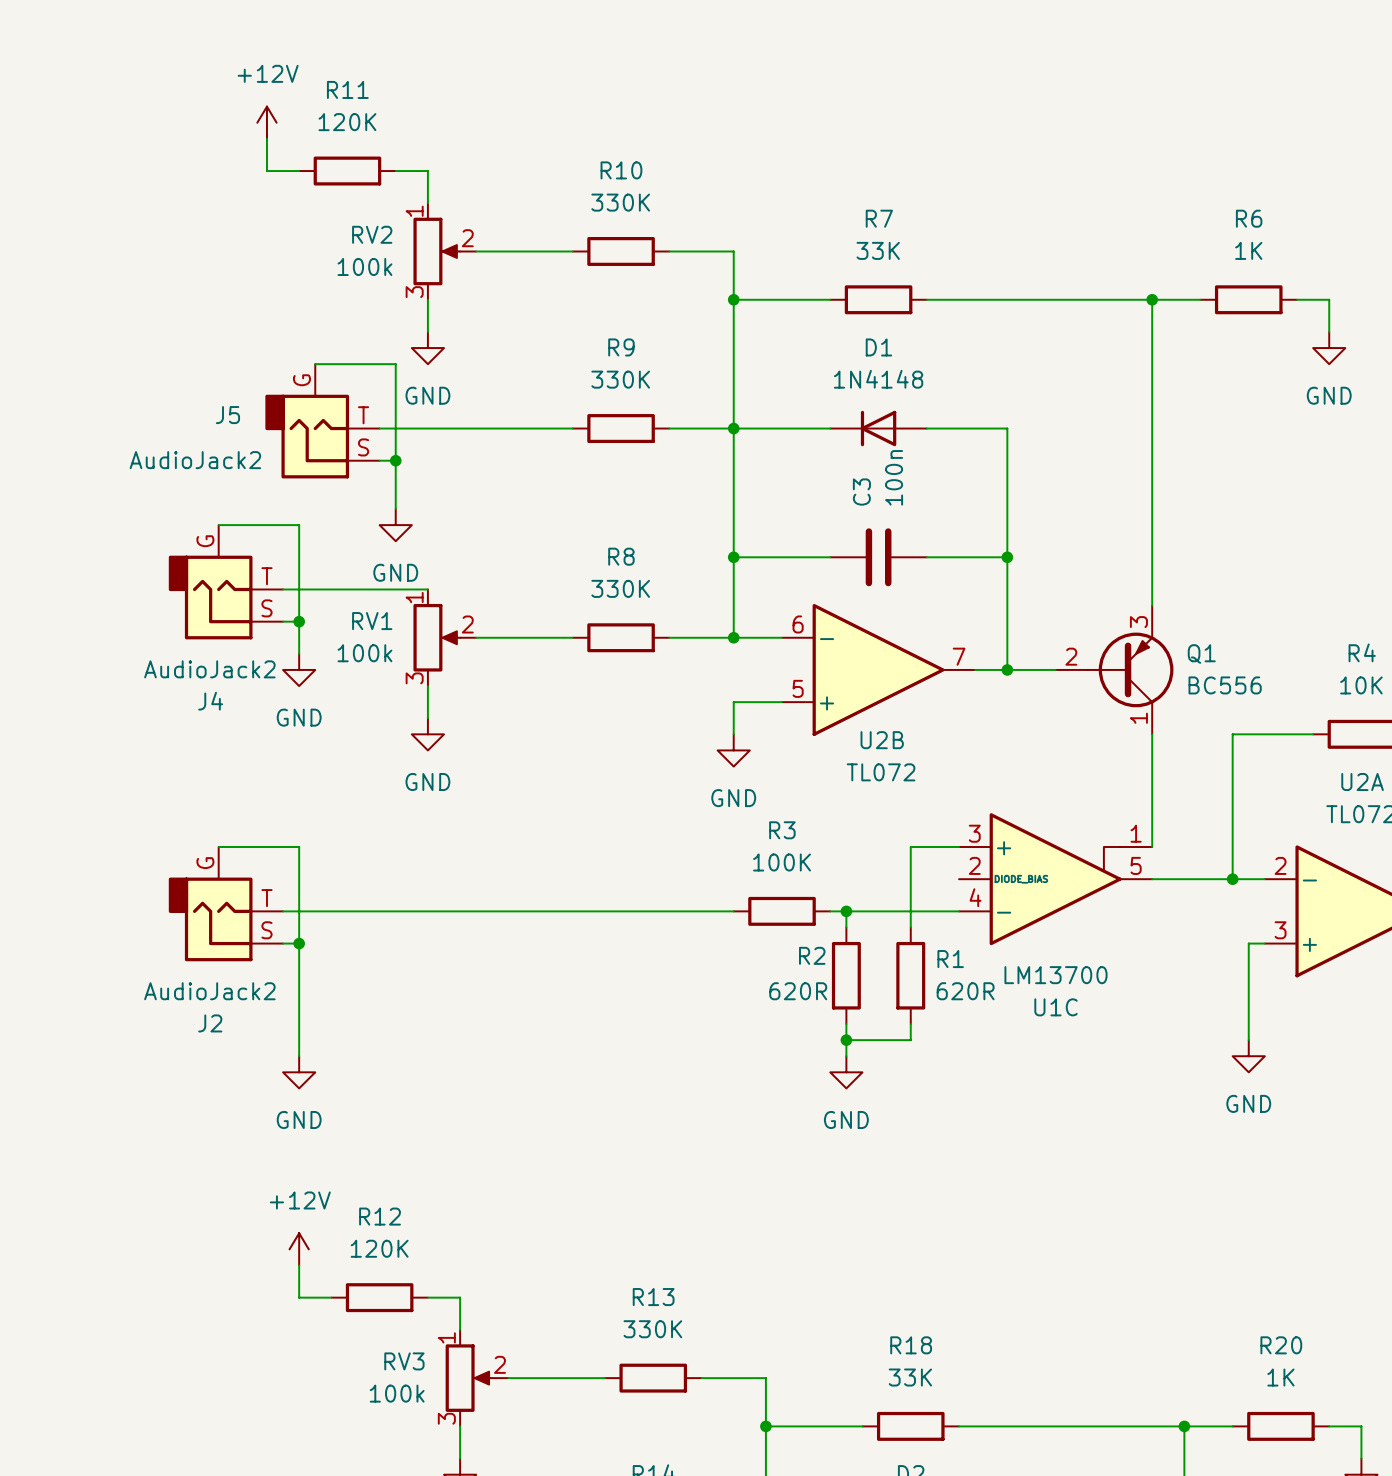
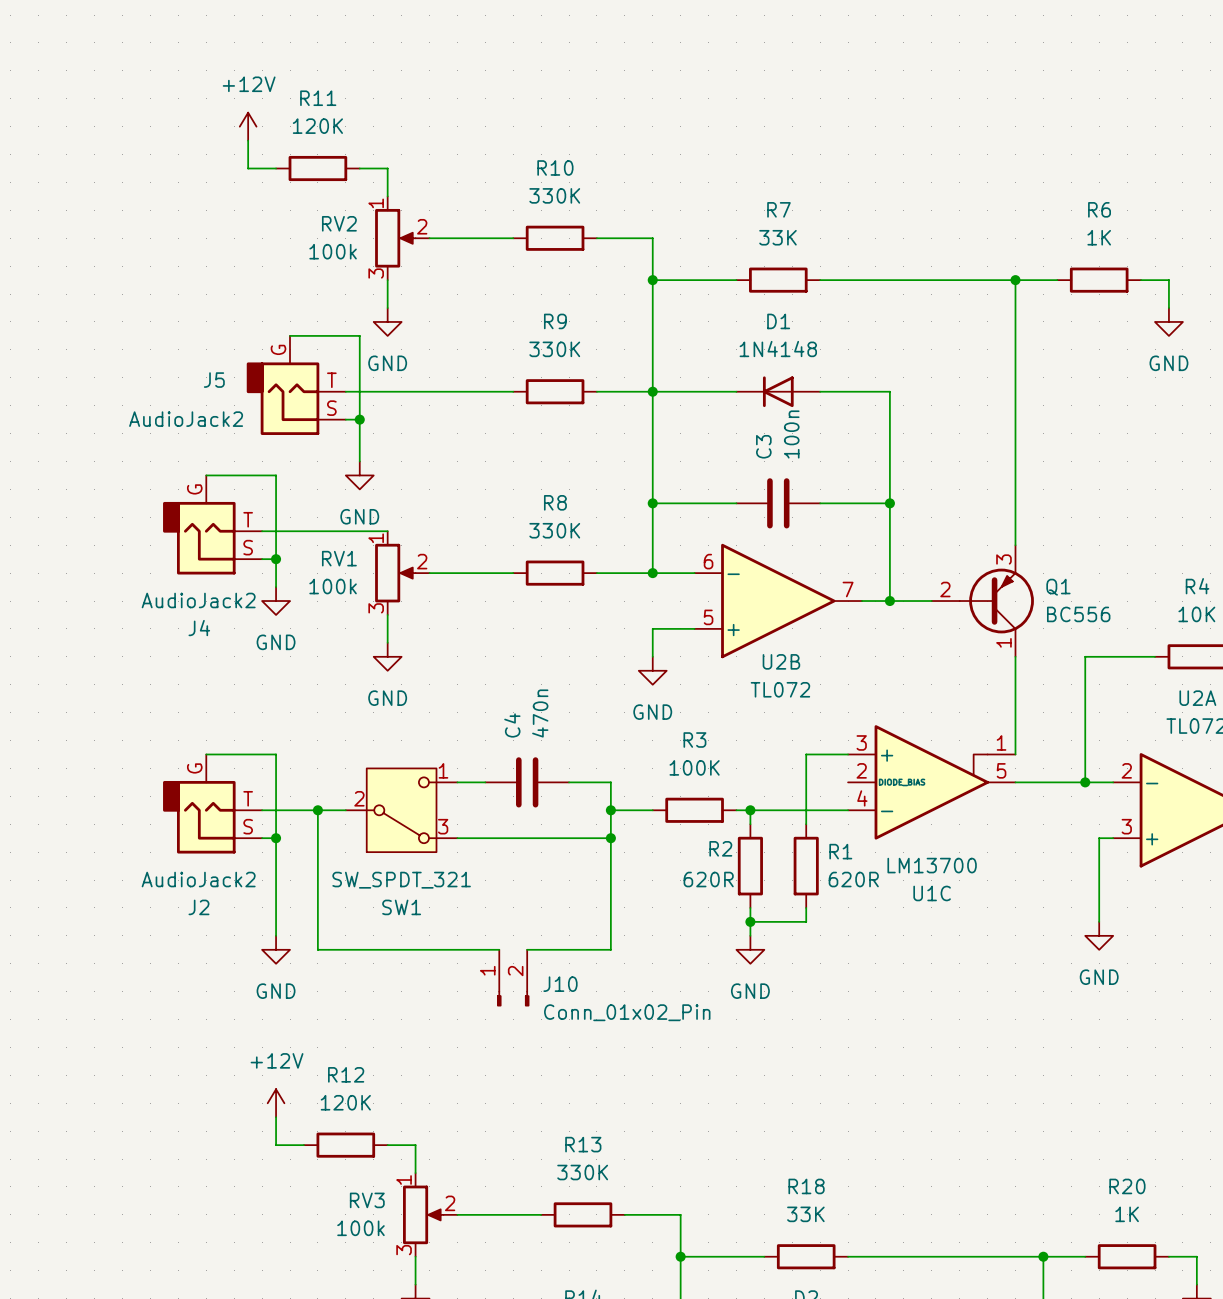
wire: none -> (457, 782) (485, 782)
C4: none -> 470n (527, 782)
wire: none -> (569, 782) (610, 782) (610, 949) (527, 949)
wire: none -> (317, 810) (317, 949) (499, 949)
junction: none -> (317, 810)
wire: (379, 911) (685, 911) -> none
SW1: none -> SW_SPDT_321 (401, 810)
junction: none -> (610, 810)
wire: none -> (457, 838) (610, 838)
junction: none -> (610, 838)
J10: none -> Conn_01x02_Pin (513, 978)

